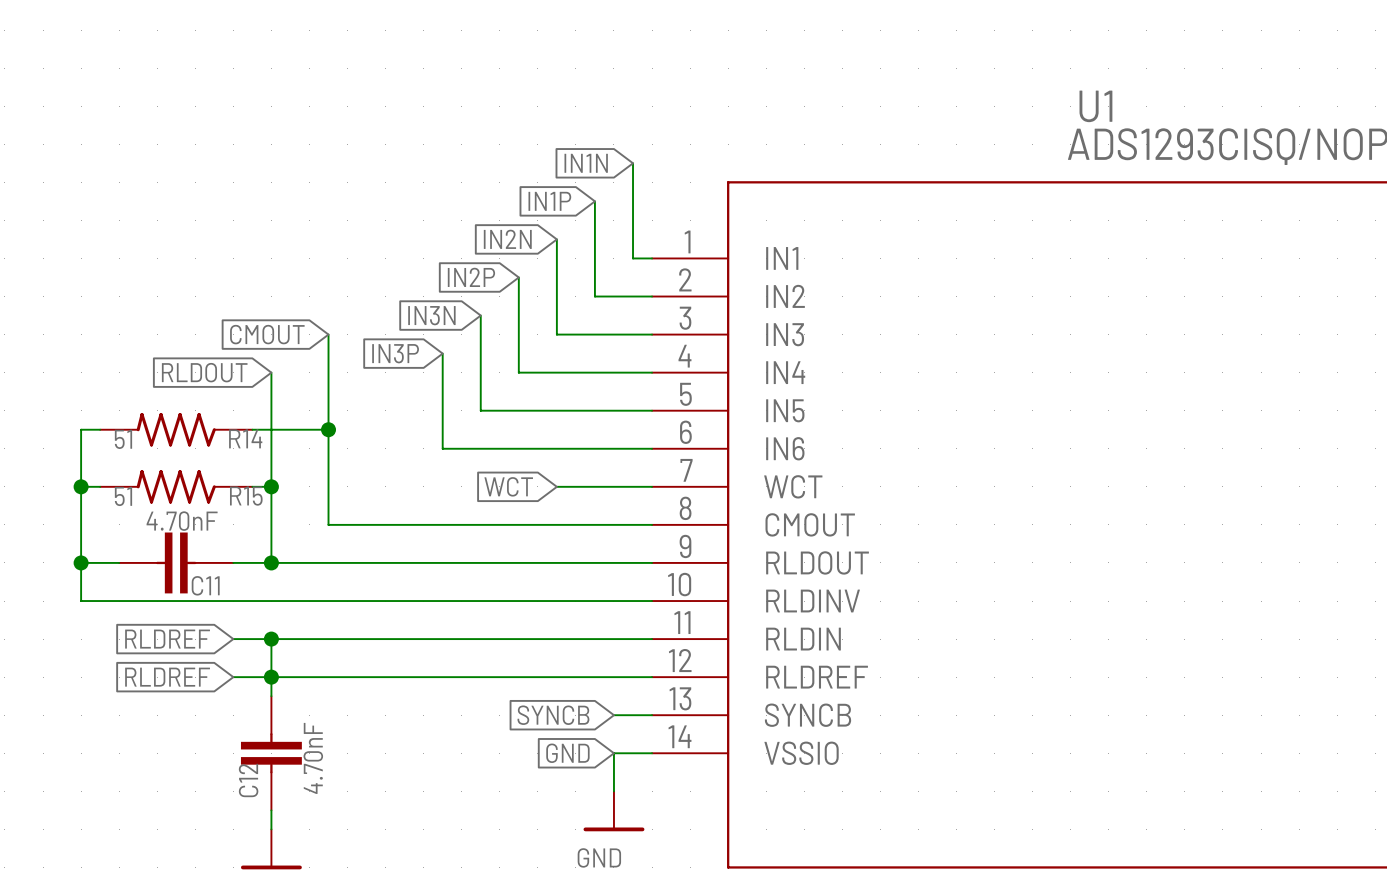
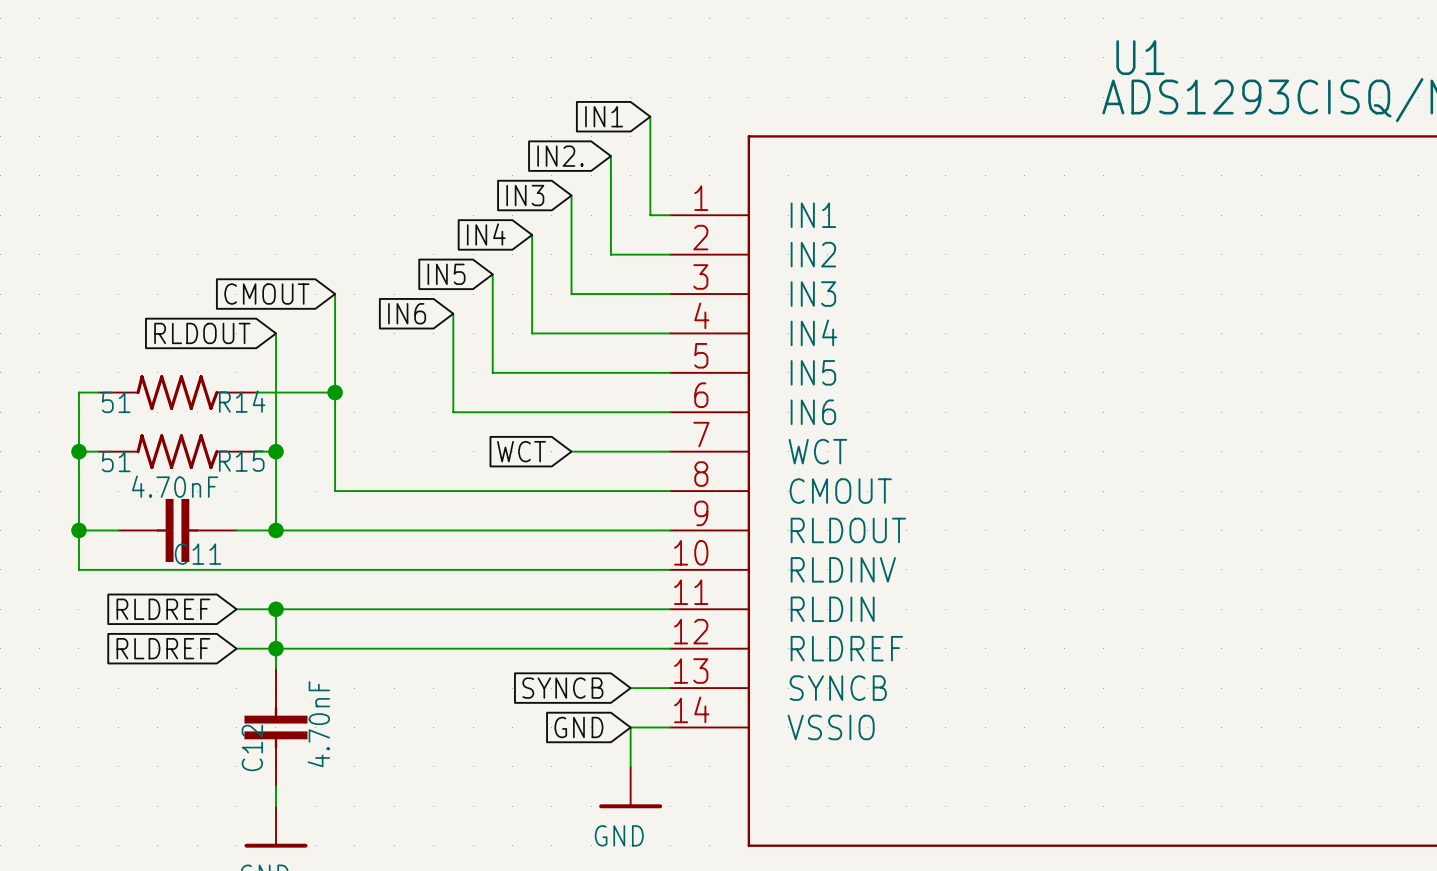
global label: IN1N (586, 163) -> IN1 (604, 116)
global label: IN1P (549, 201) -> IN2. (560, 156)
global label: IN2N (507, 239) -> IN3 (525, 195)
global label: IN2P (471, 277) -> IN4 (486, 234)
global label: IN3N (431, 315) -> IN5 (446, 274)
global label: IN3P (395, 353) -> IN6 (407, 313)

